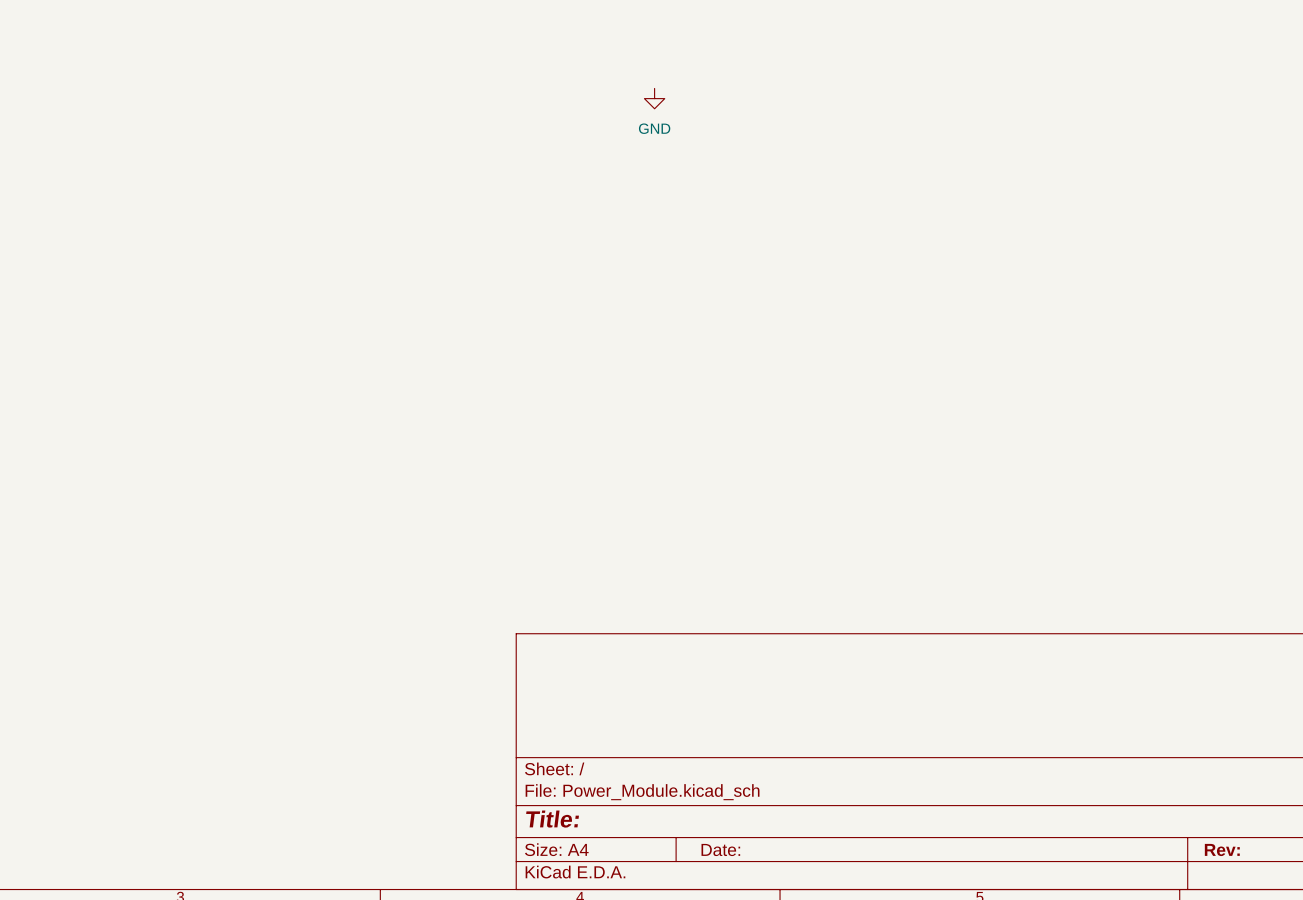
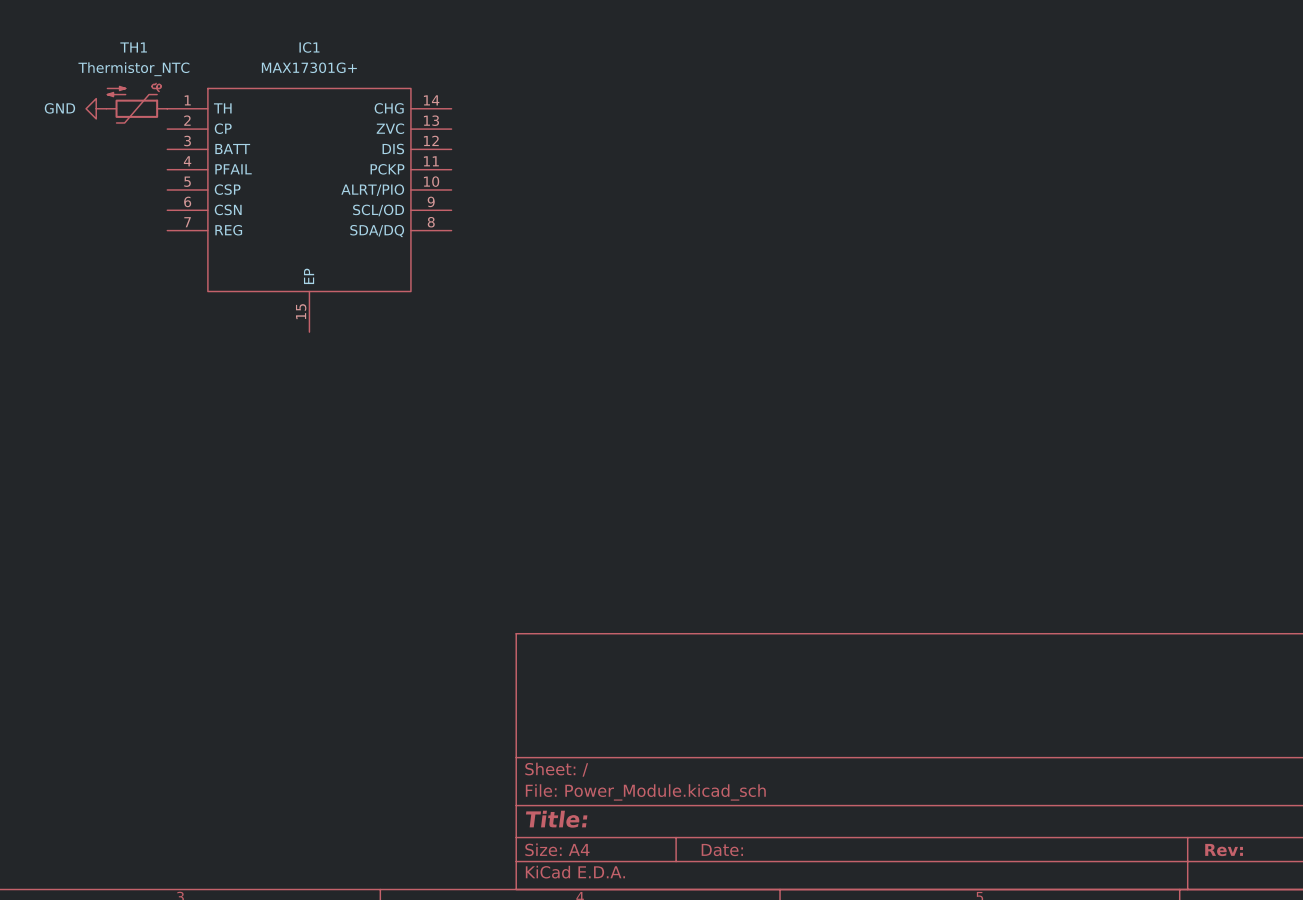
power symbol: GND (654, 98) -> none
TH1: none -> Thermistor_NTC (136, 103)
power symbol: none -> GND (96, 108)
IC1: none -> MAX17301G+ (309, 209)

